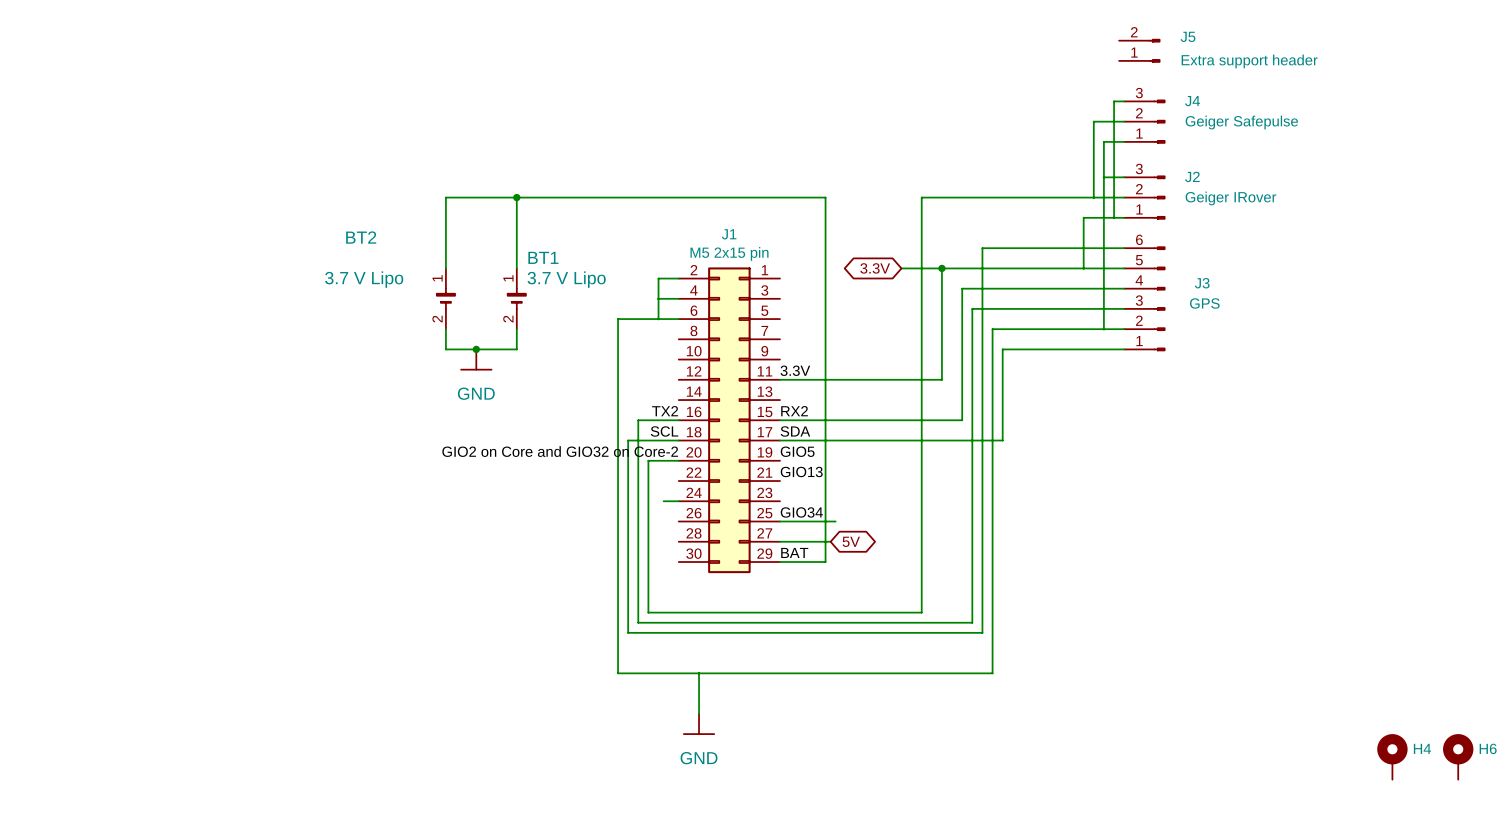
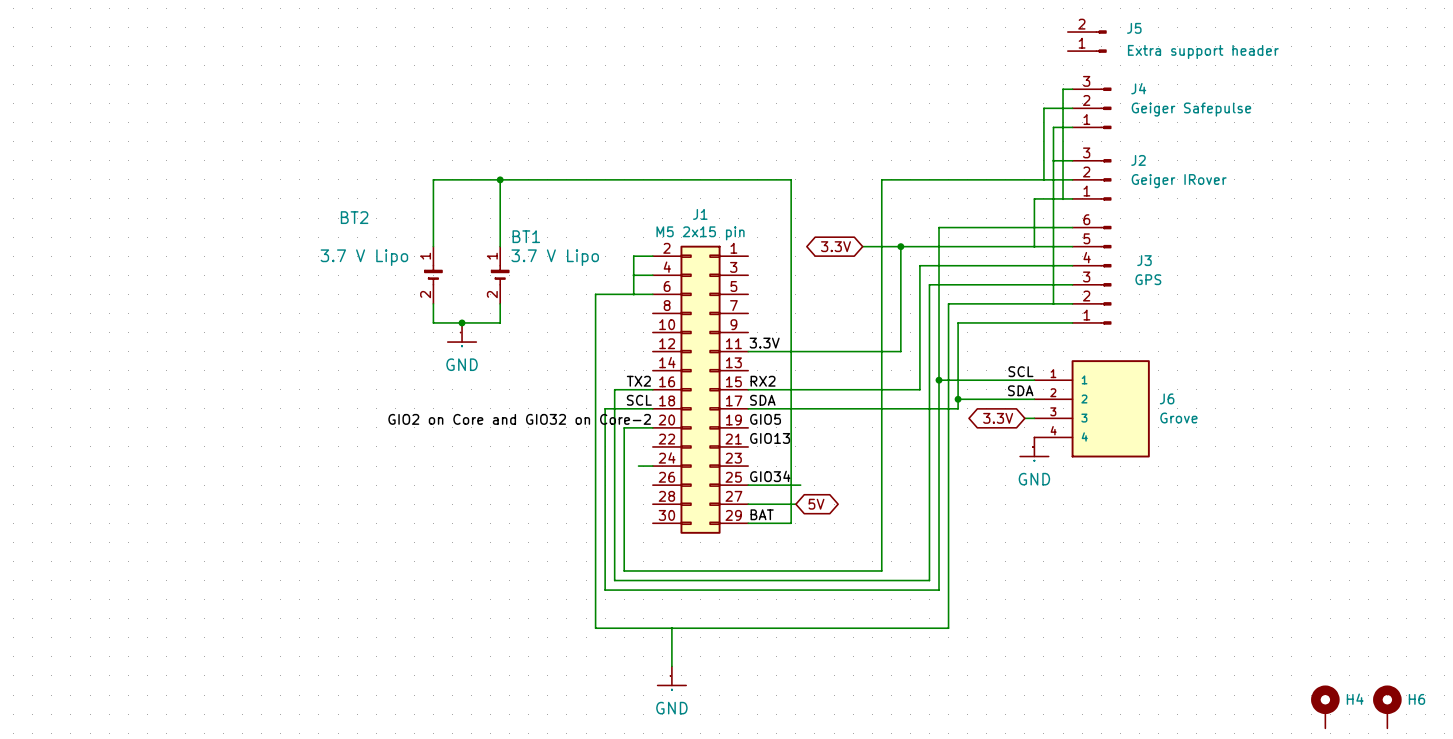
label: none -> SCL (1020, 371)
wire: none -> (939, 380) (1034, 380)
junction: none -> (939, 380)
label: none -> SDA (1020, 390)
wire: none -> (958, 399) (1034, 399)
junction: none -> (958, 399)
J6: none -> Grove (1092, 408)
global label: none -> 3.3V (998, 418)
wire: none -> (1024, 418) (1034, 418)
power symbol: none -> GND (1034, 446)

